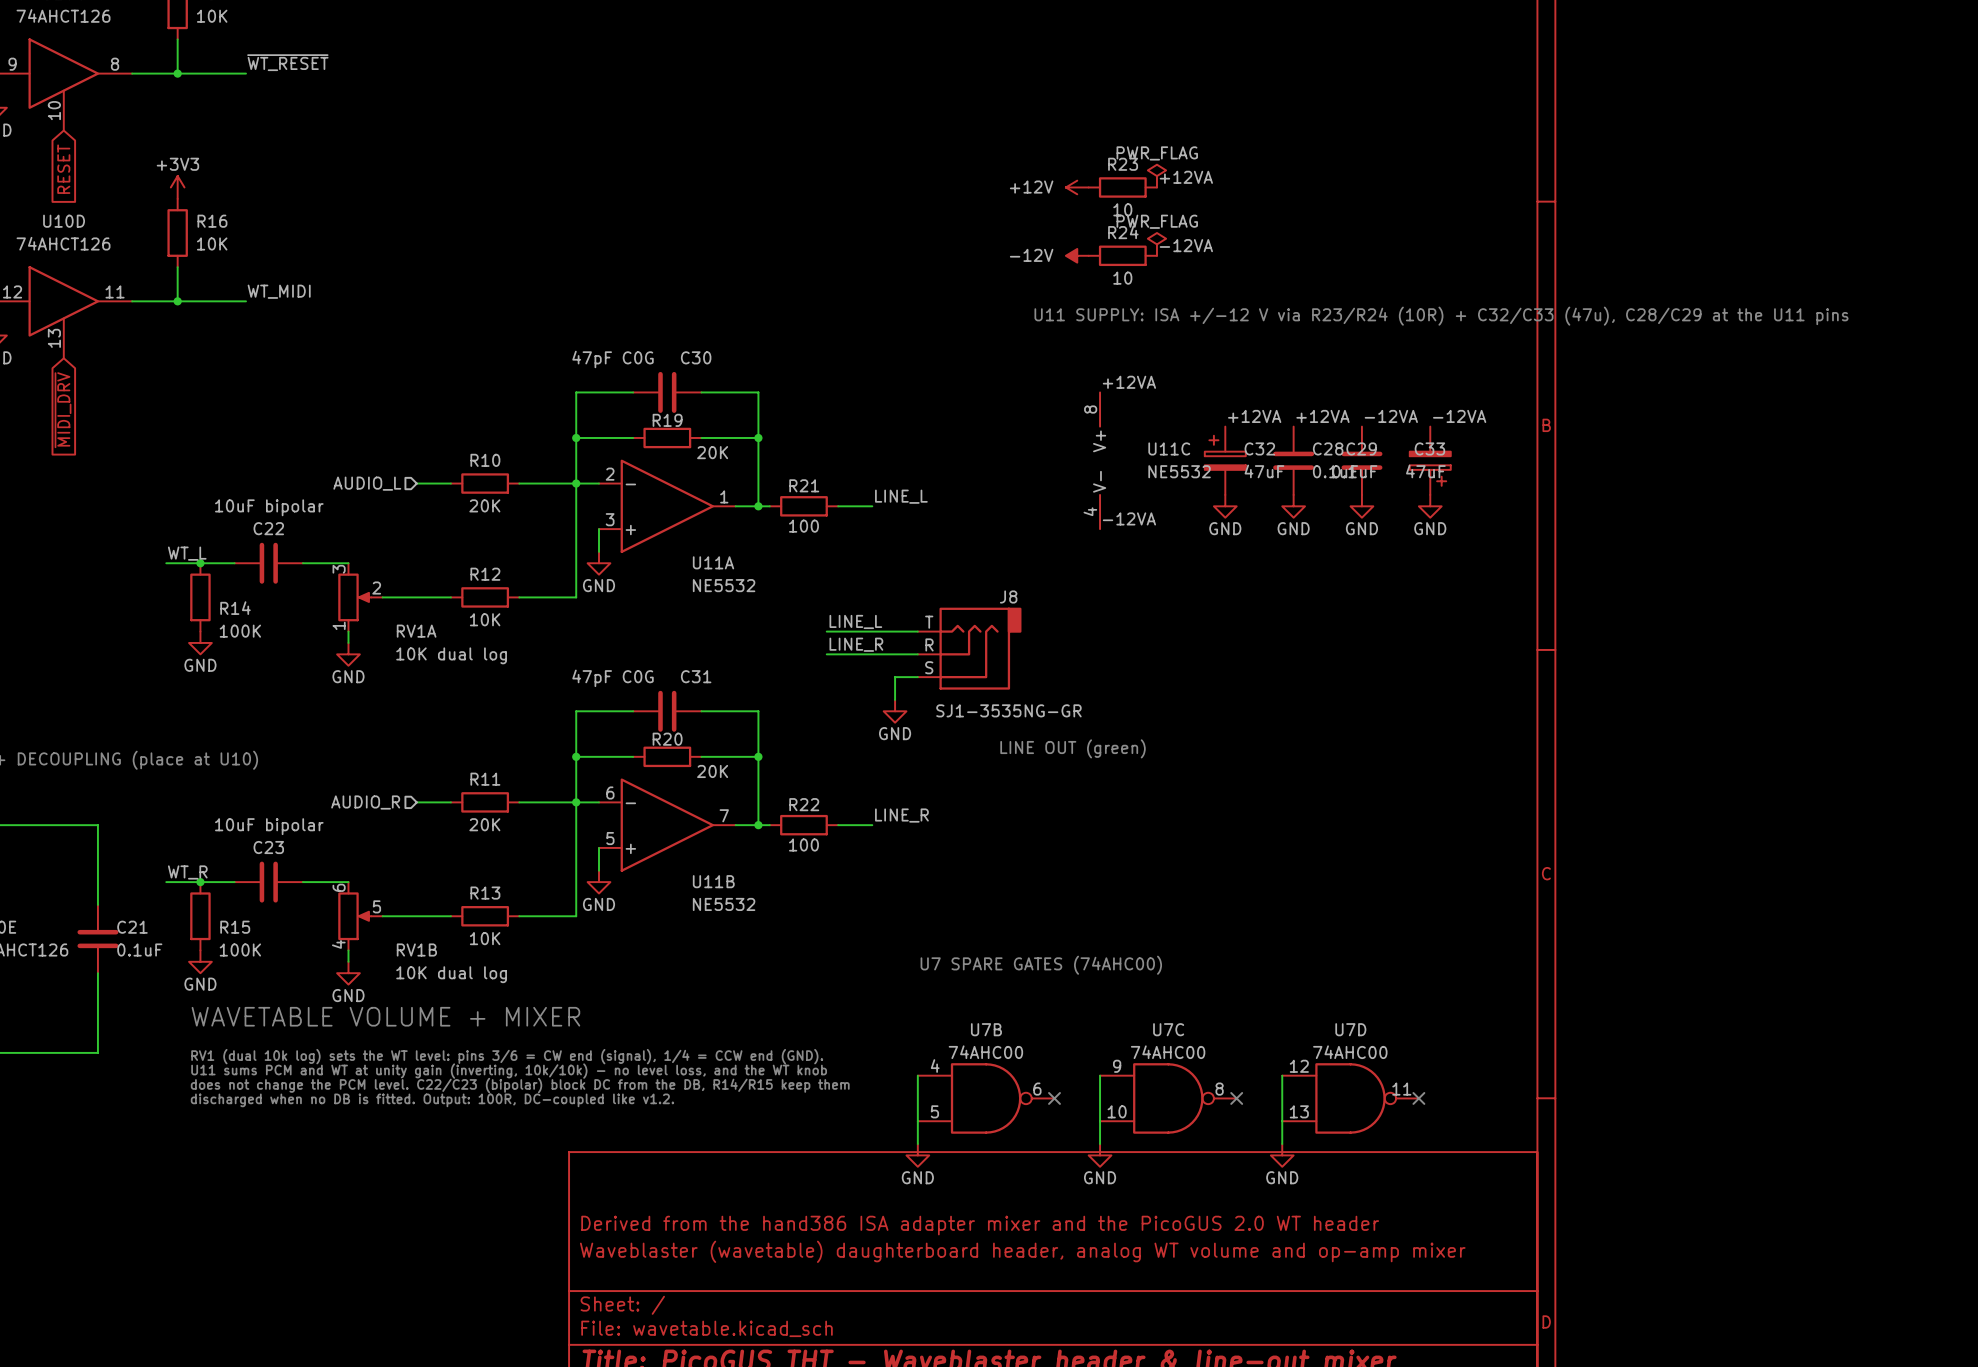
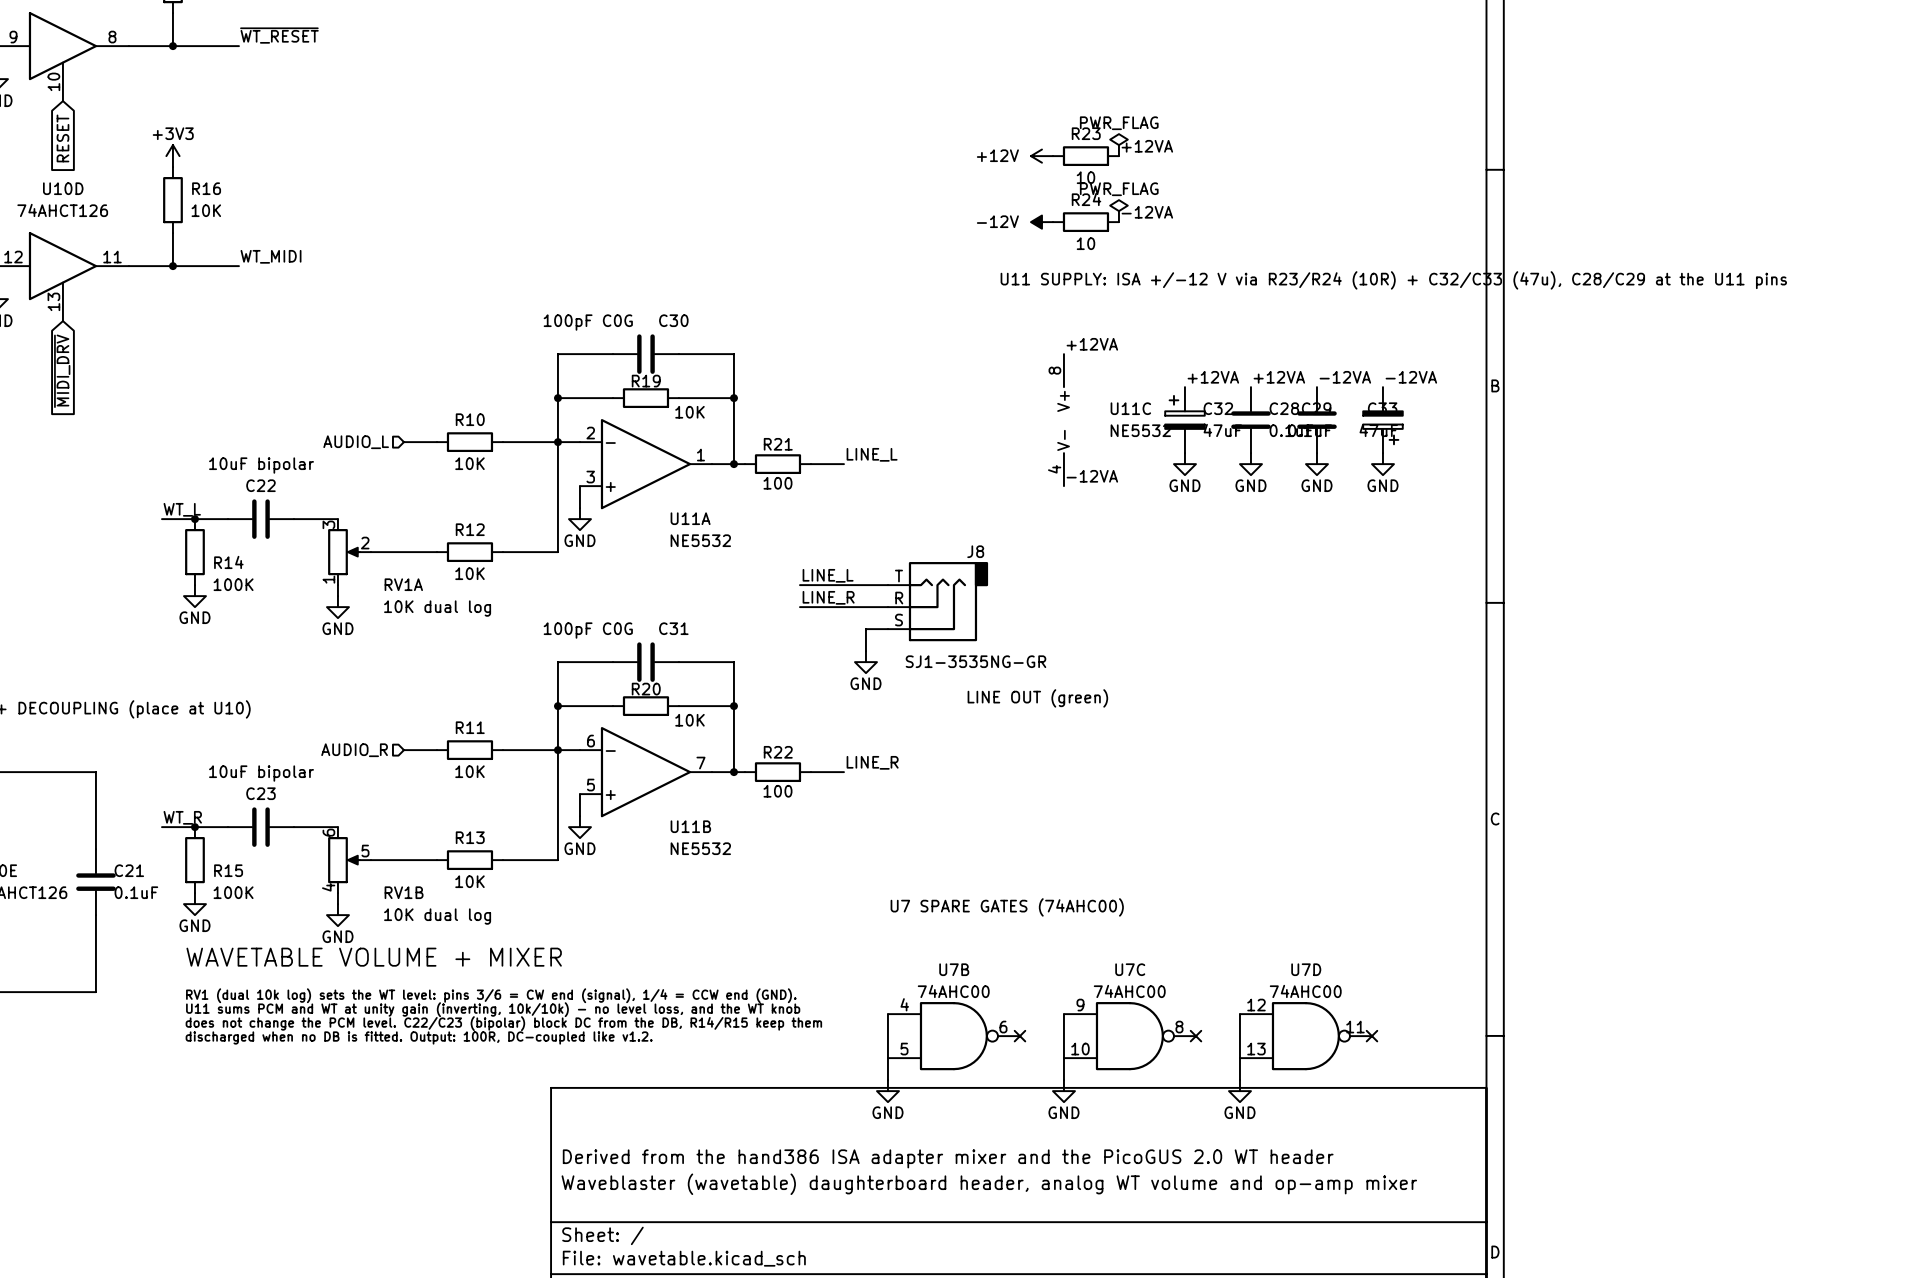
C30 value: 47pF C0G (613, 359) -> 100pF C0G (588, 322)
R19 value: 20K (712, 452) -> 10K (689, 412)
R10 value: 20K (484, 505) -> 10K (469, 463)
C31 value: 47pF C0G (613, 678) -> 100pF C0G (588, 630)
R20 value: 20K (712, 771) -> 10K (689, 720)
R11 value: 20K (484, 824) -> 10K (469, 771)

